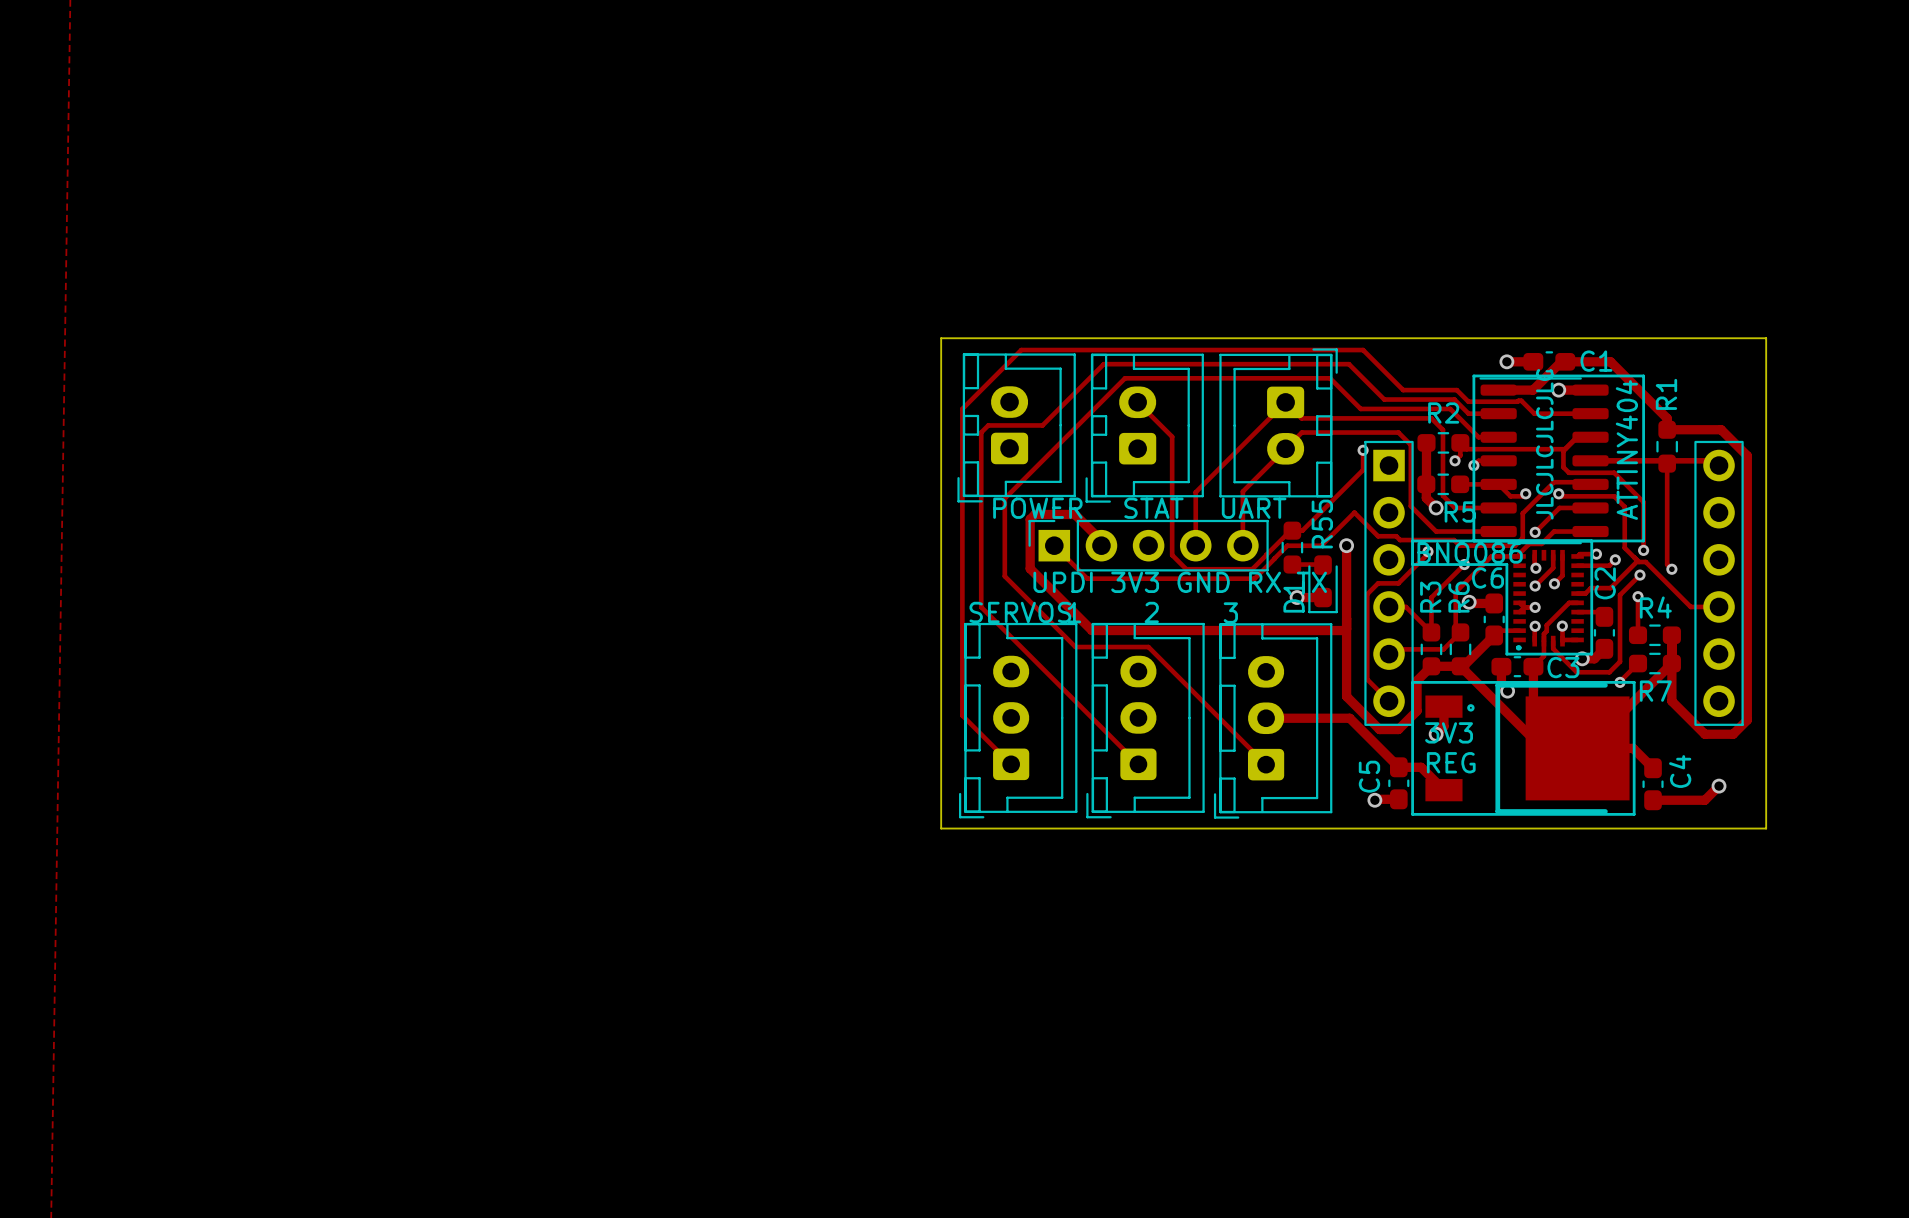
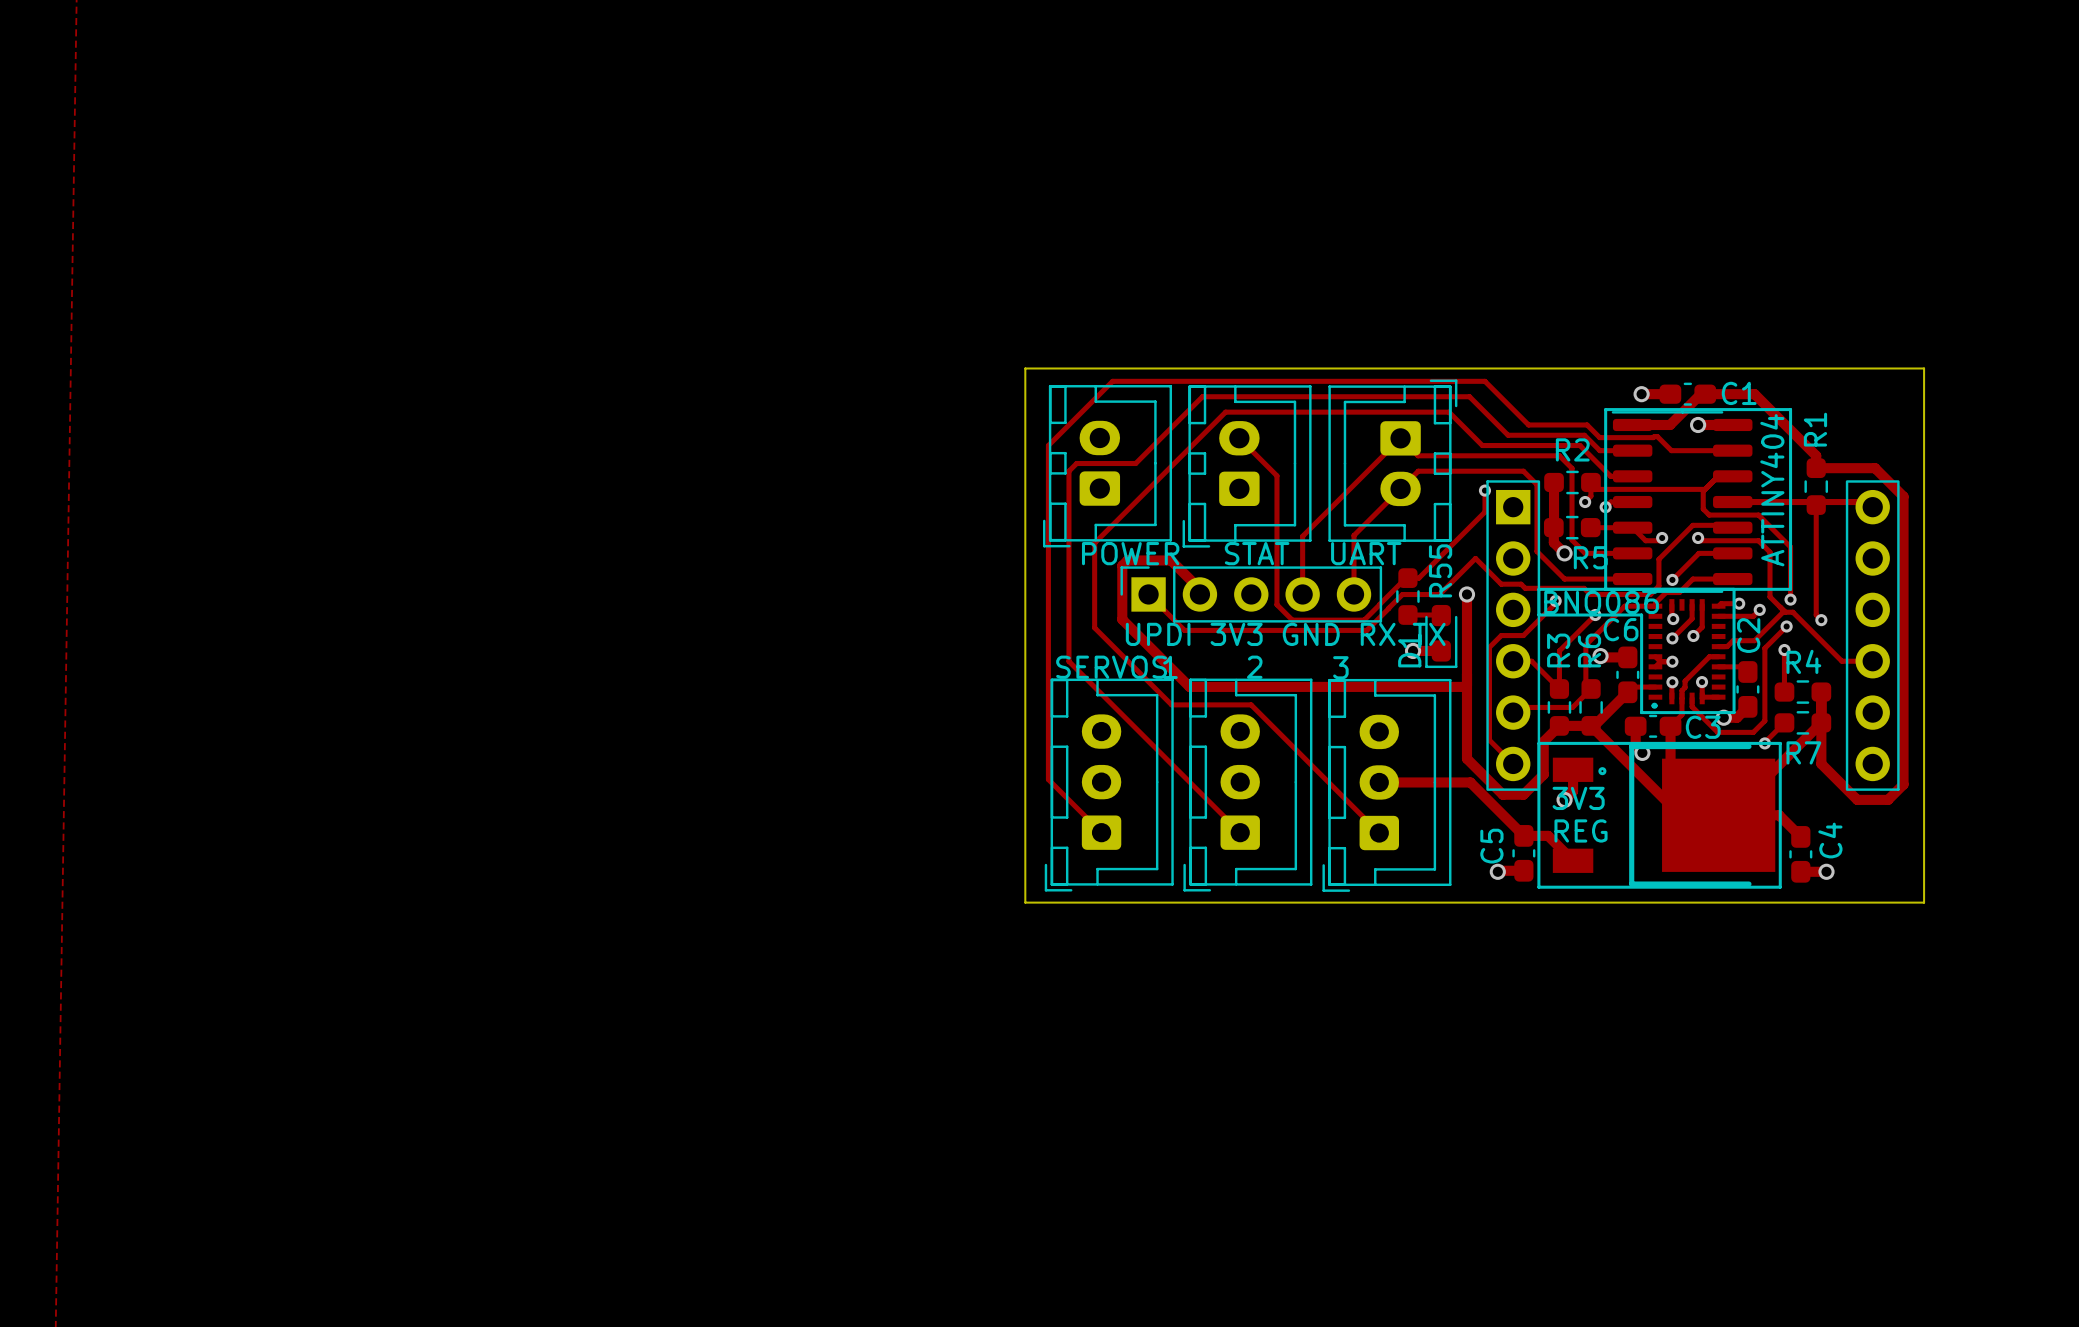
text: JLCJLCJLCJLC (1544, 444) -> none
track: (1719, 786) (1704, 800) (1676, 800) -> none
via position: (1719, 786) -> (1826, 871)

